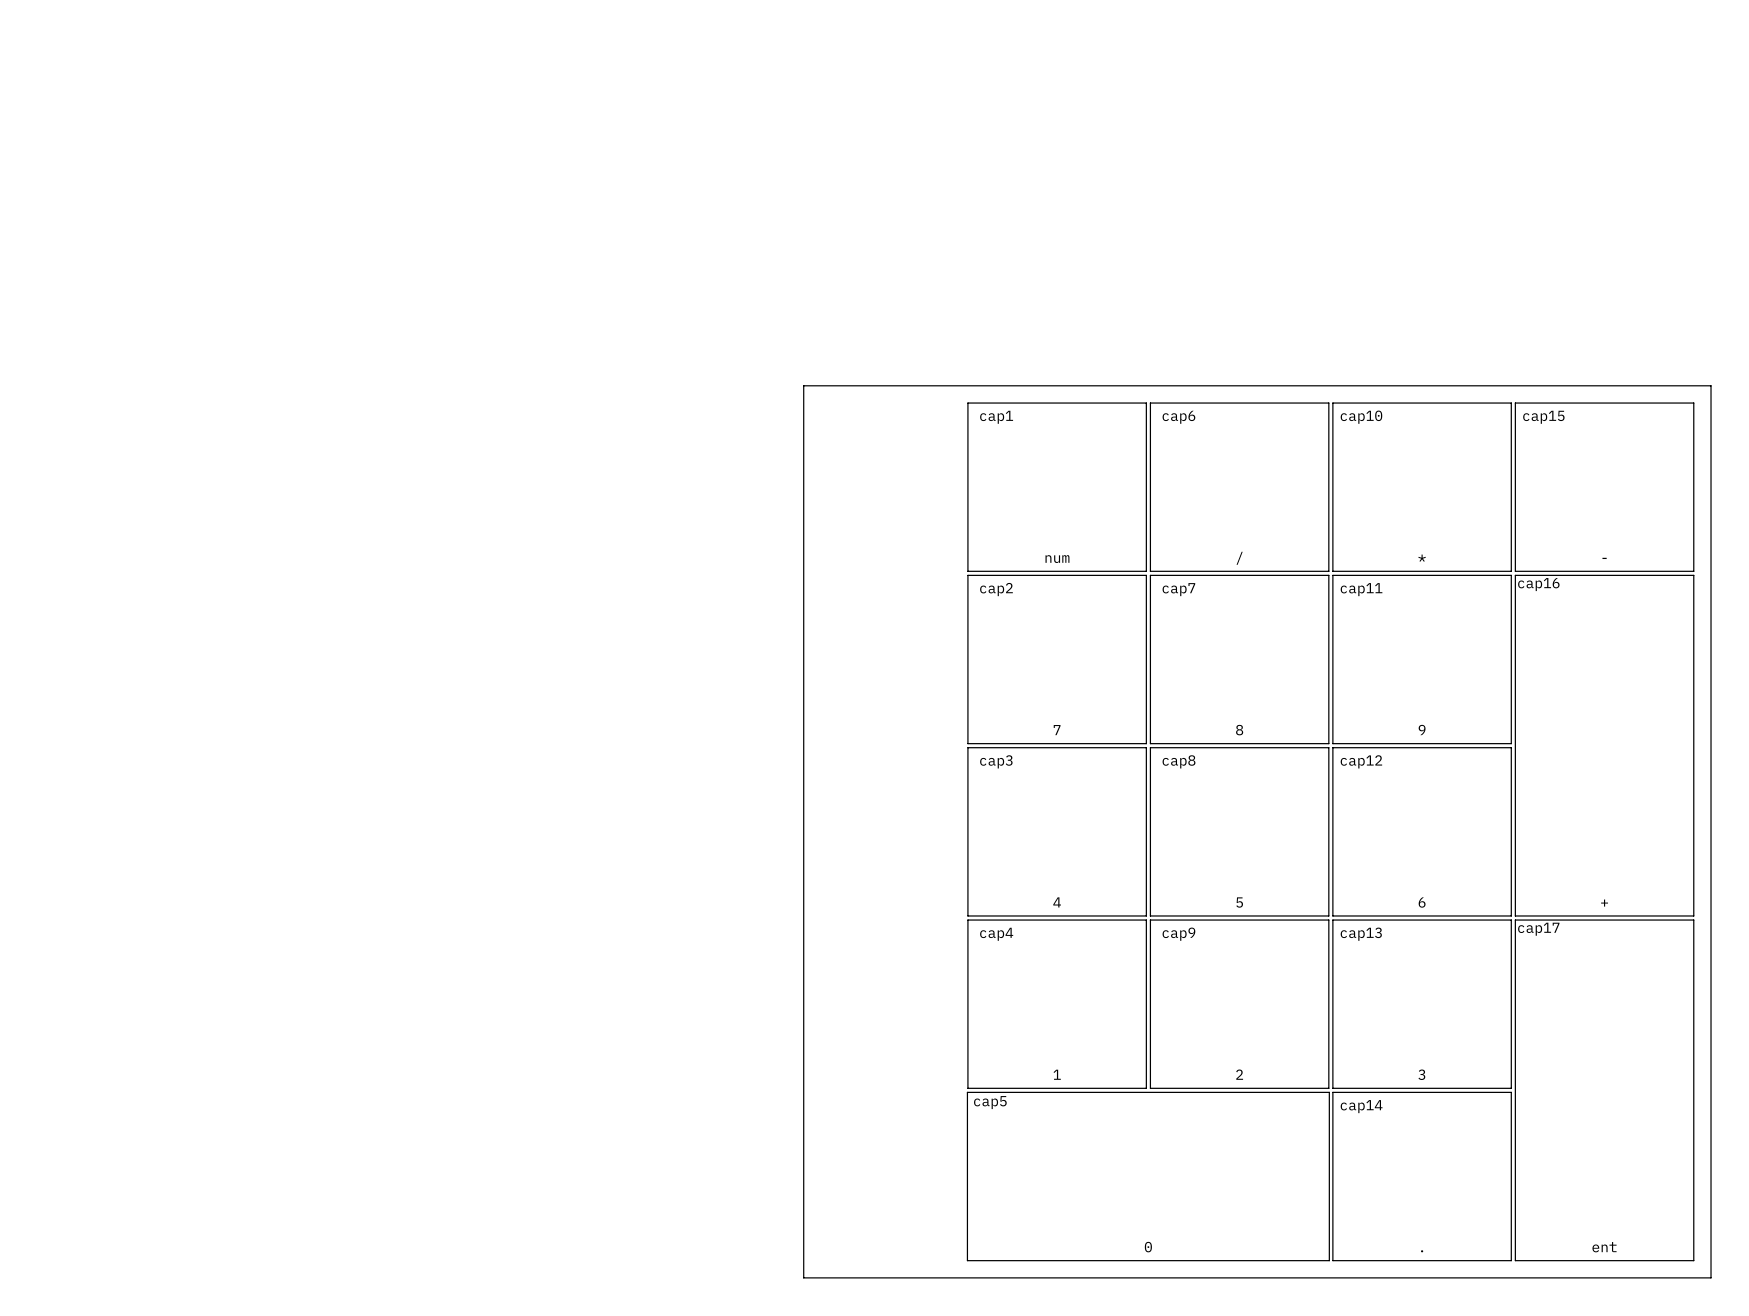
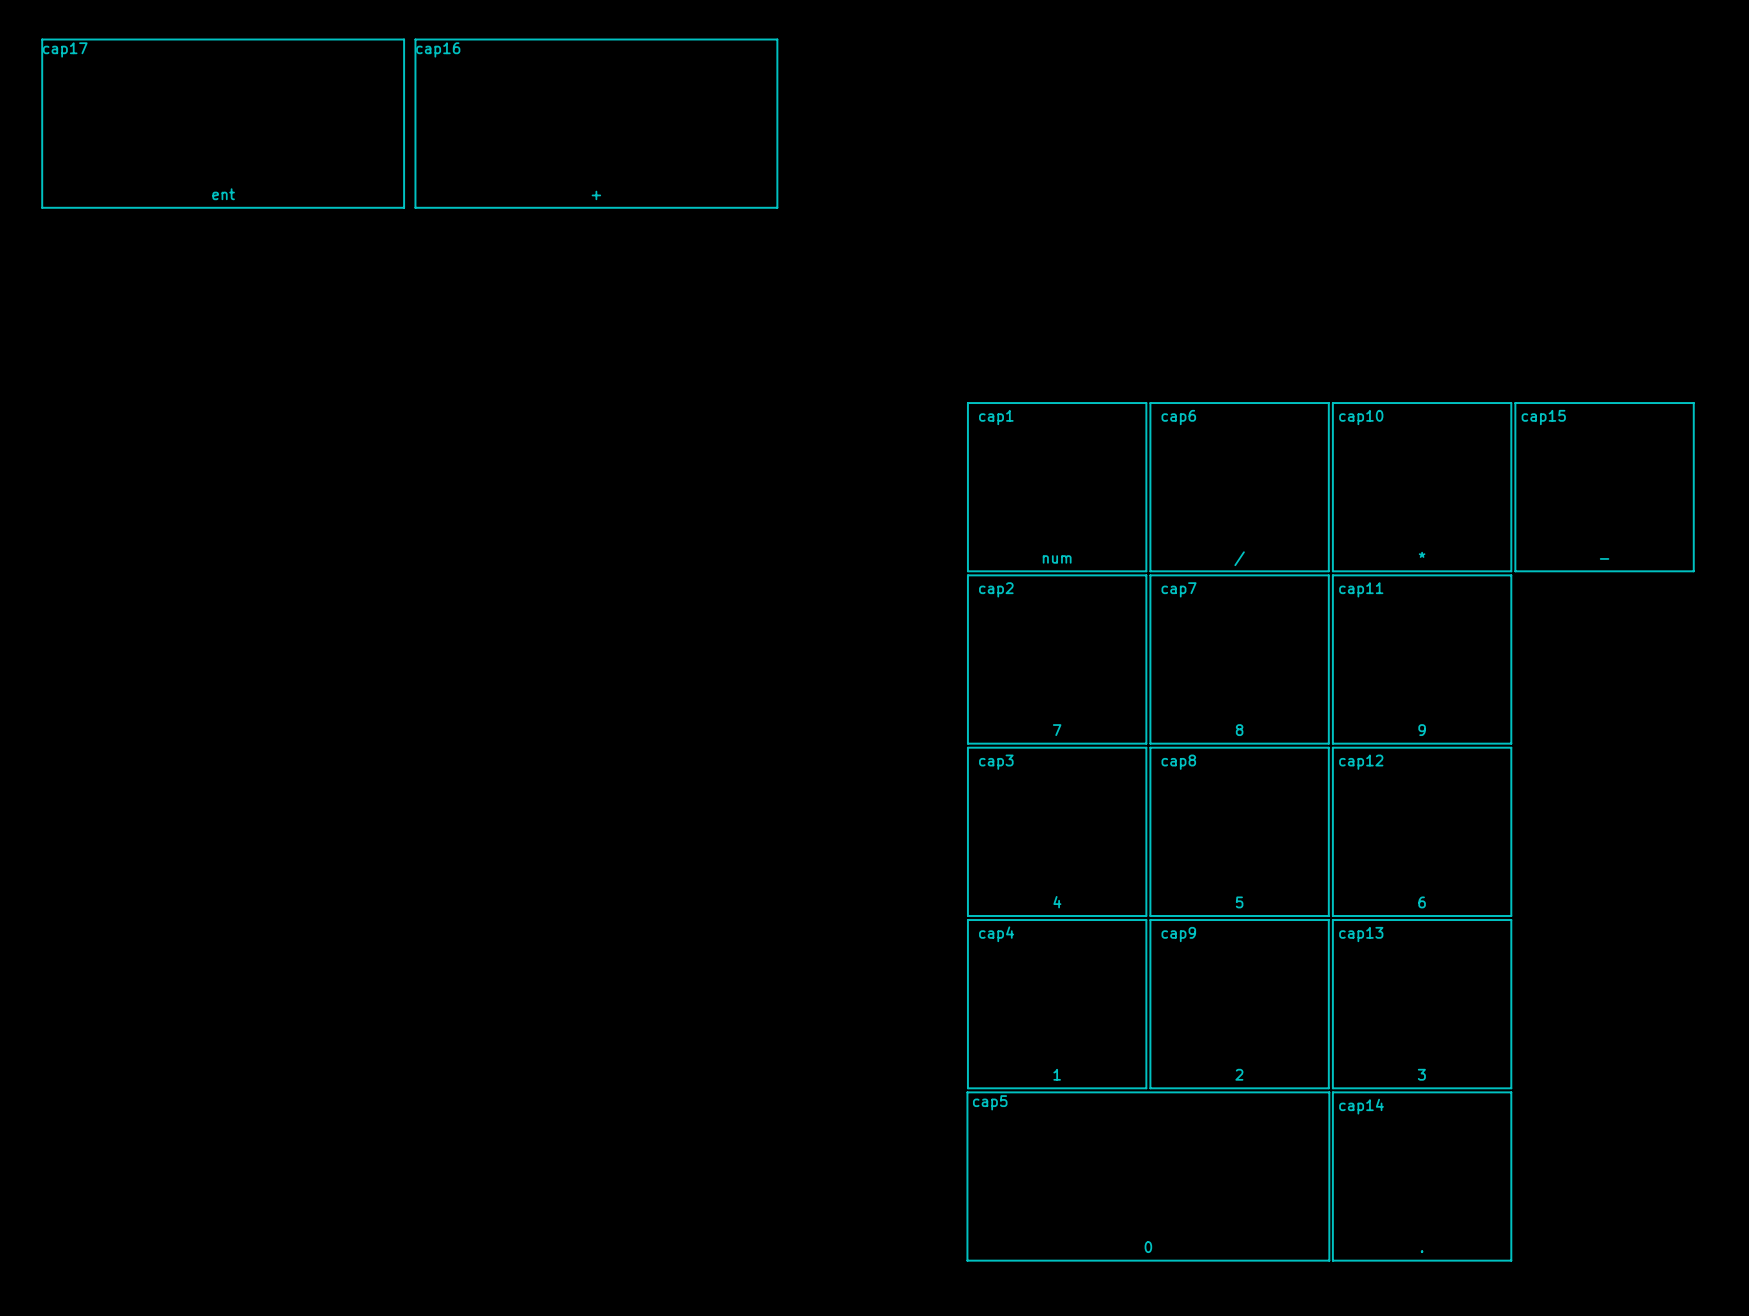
board edge: (803, 385) (1711, 385) (1711, 1277) (803, 1277) (803, 385) -> none
cap16 footprint: [1514, 574, 1695, 917] -> [414, 38, 778, 209]
cap16 name position: cap16 (1538, 584) -> cap16 (438, 49)
cap16 value position: + (1604, 903) -> + (596, 195)
cap17 footprint: [1514, 919, 1695, 1262] -> [41, 38, 405, 209]
cap17 name position: cap17 (1538, 929) -> cap17 (65, 49)
cap17 value position: ent (1604, 1247) -> ent (223, 194)

